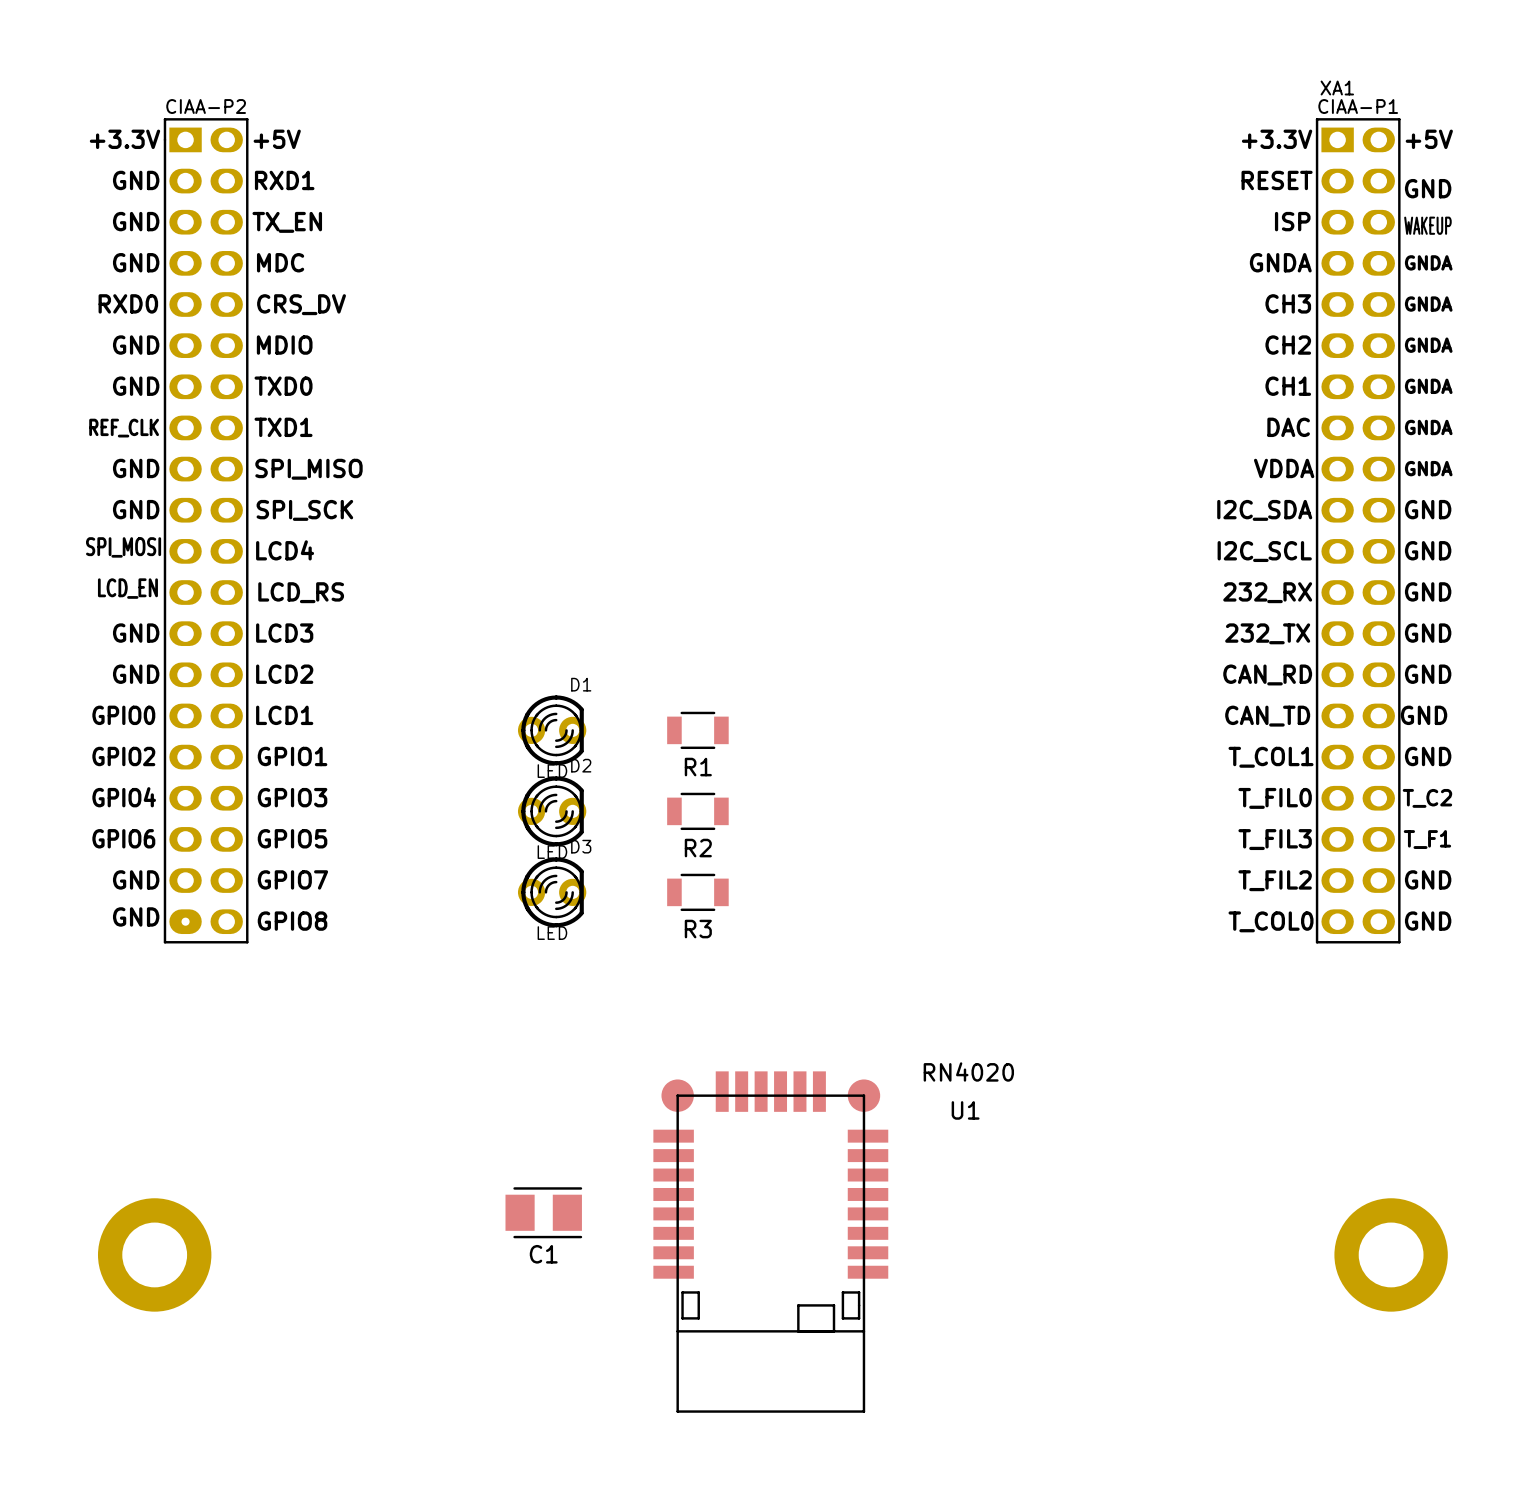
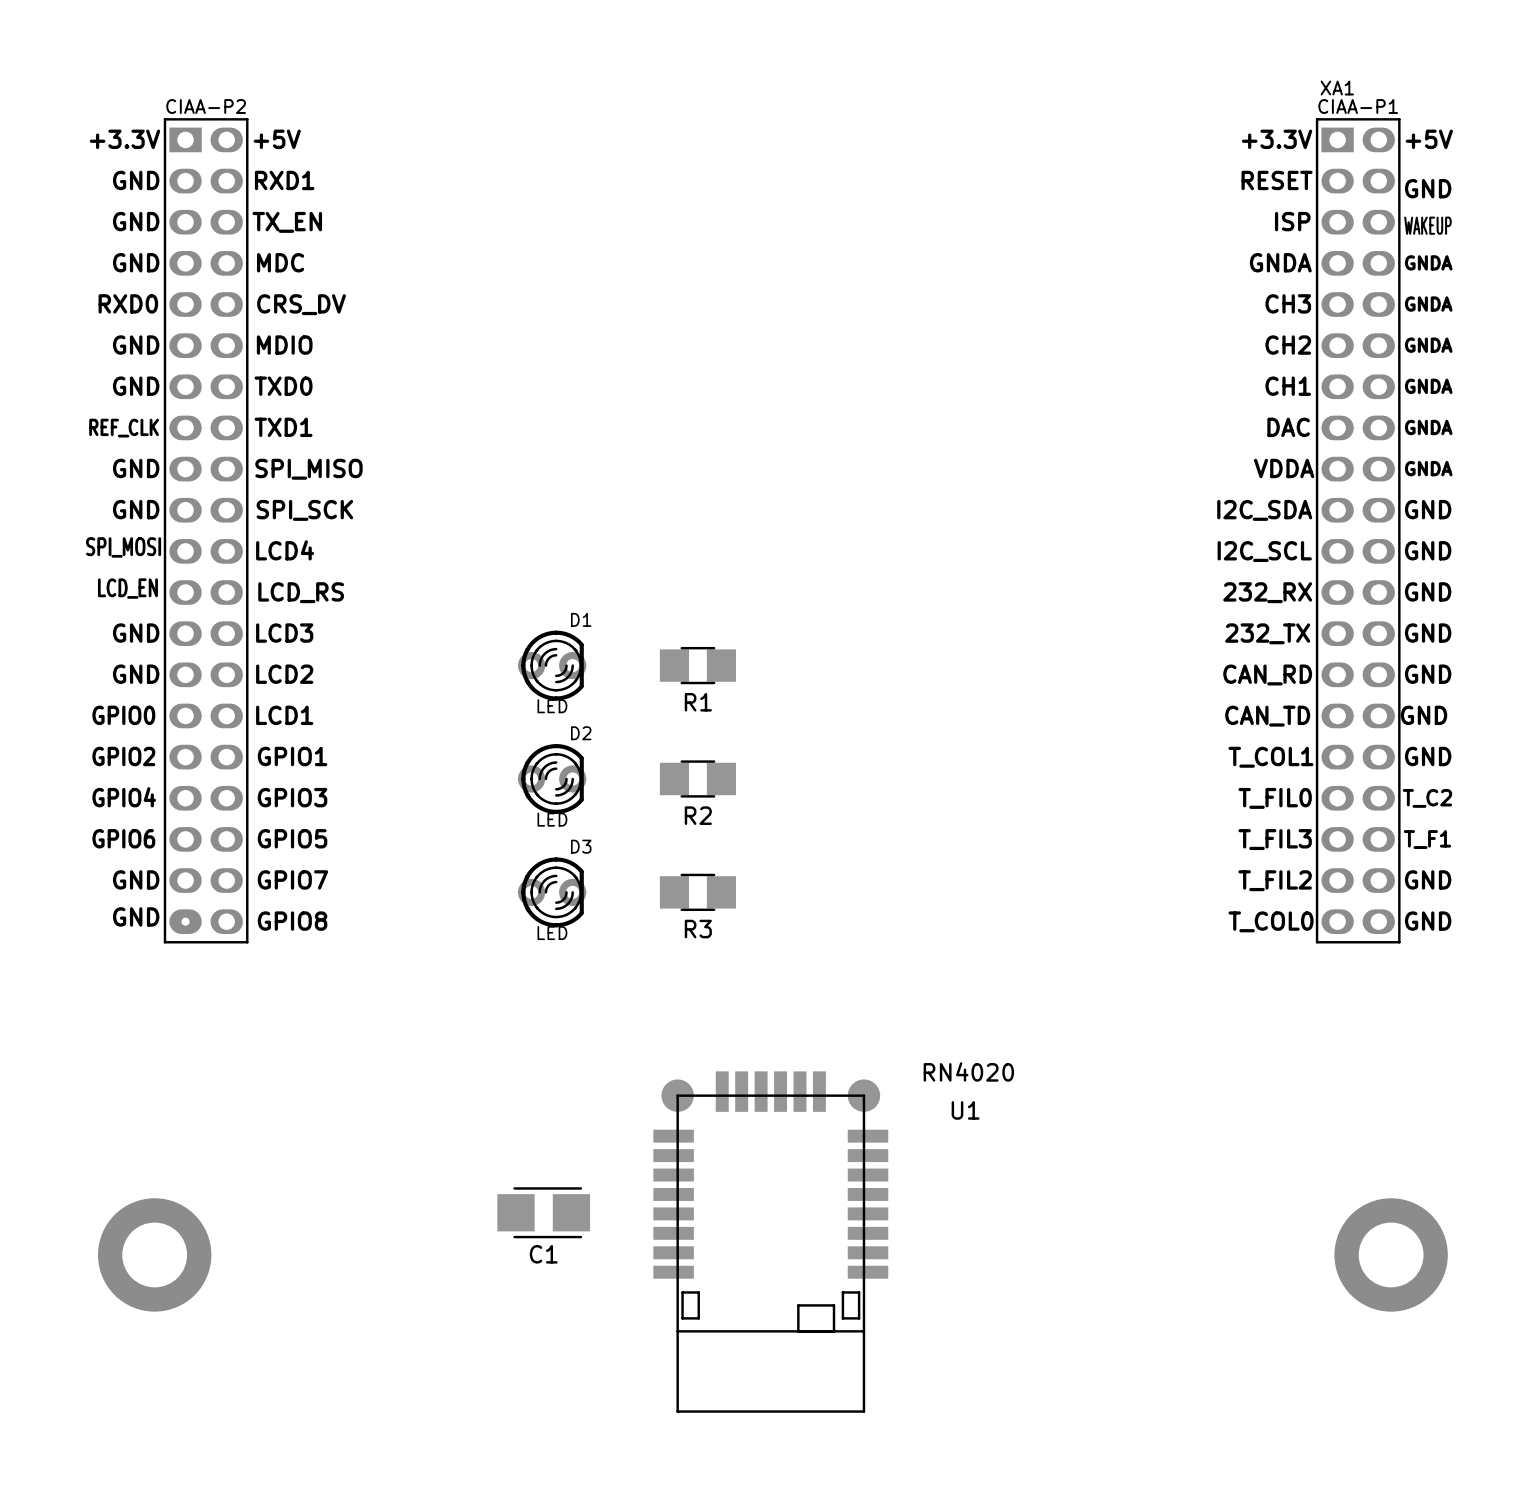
R1 footprint: [667, 711, 729, 750] -> [659, 646, 736, 685]
D1 position: (552, 730) -> (552, 665)
R2 footprint: [667, 792, 729, 831] -> [659, 760, 736, 798]
D2 position: (552, 811) -> (552, 778)
R3 footprint: [667, 873, 729, 912] -> [659, 873, 736, 912]
C1 footprint: [505, 1187, 583, 1239] -> [497, 1187, 591, 1239]

